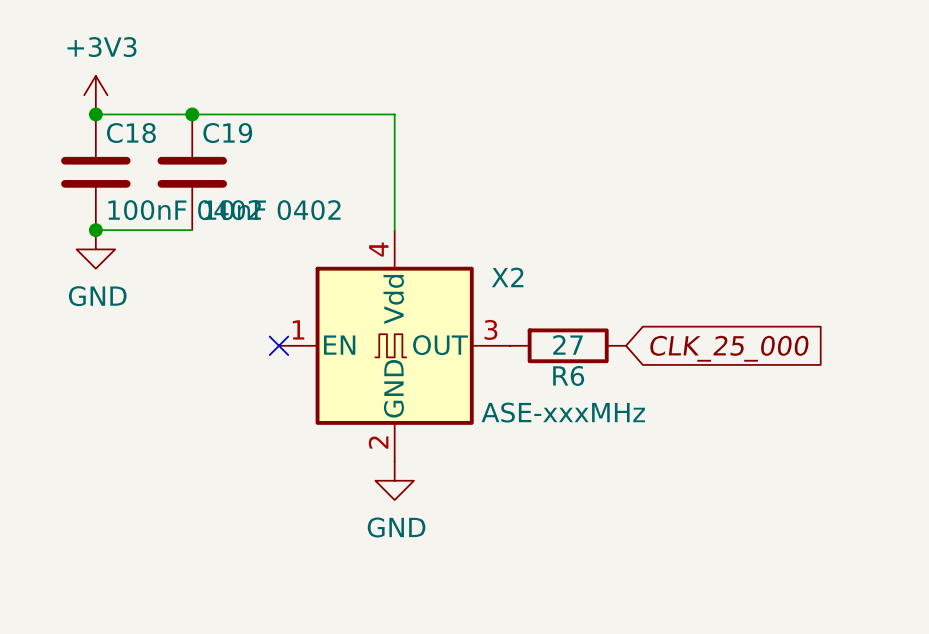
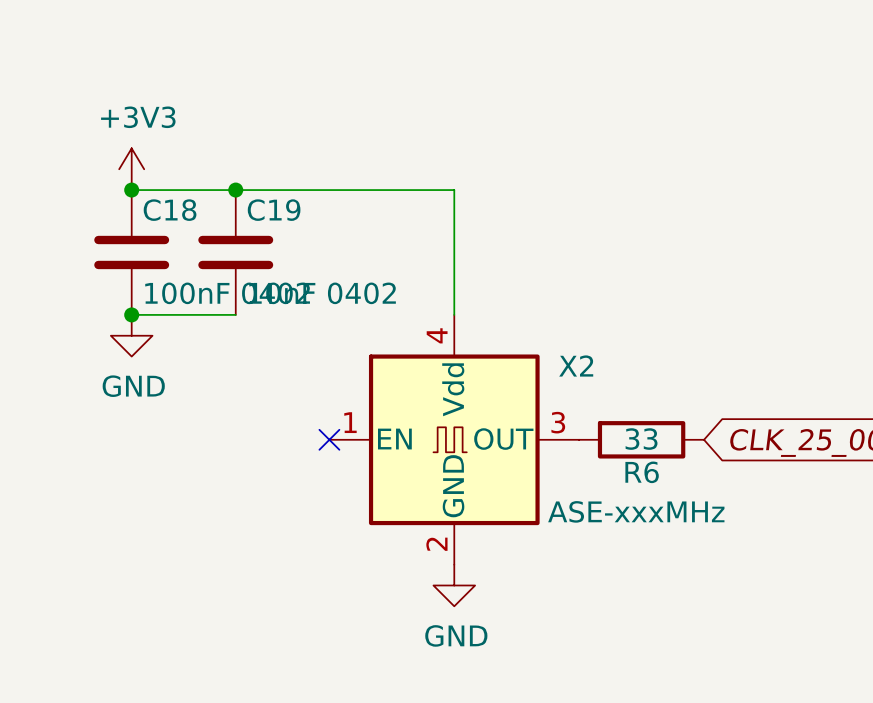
R6 value: 27 (568, 344) -> 33 (641, 439)

